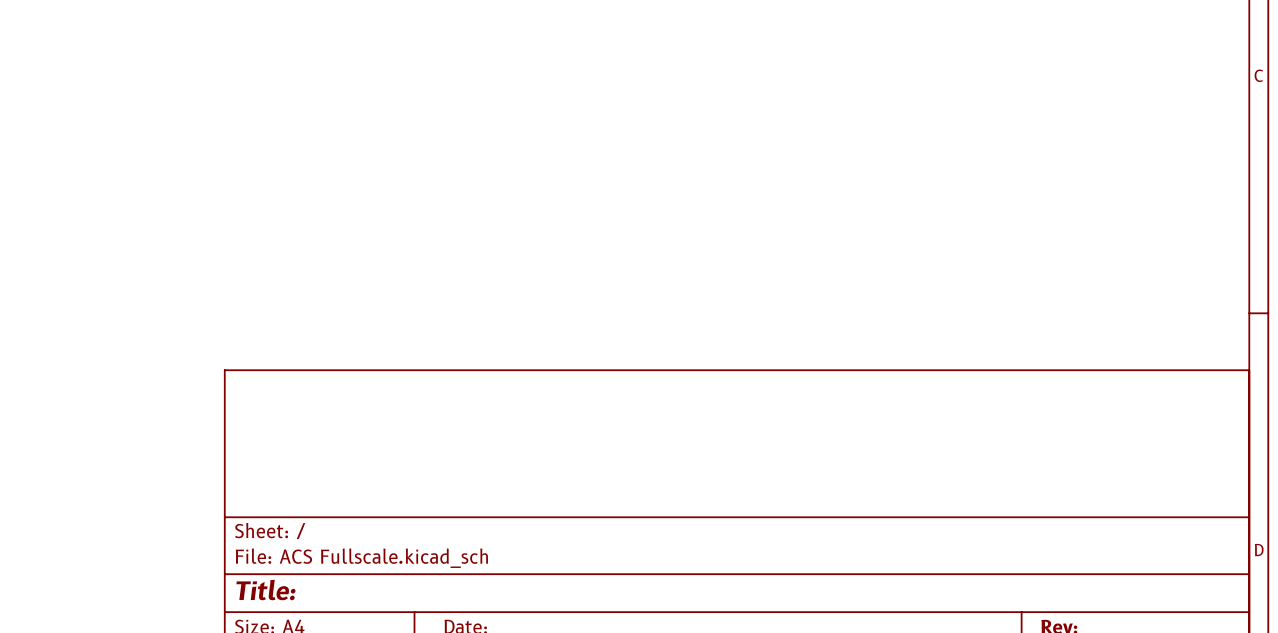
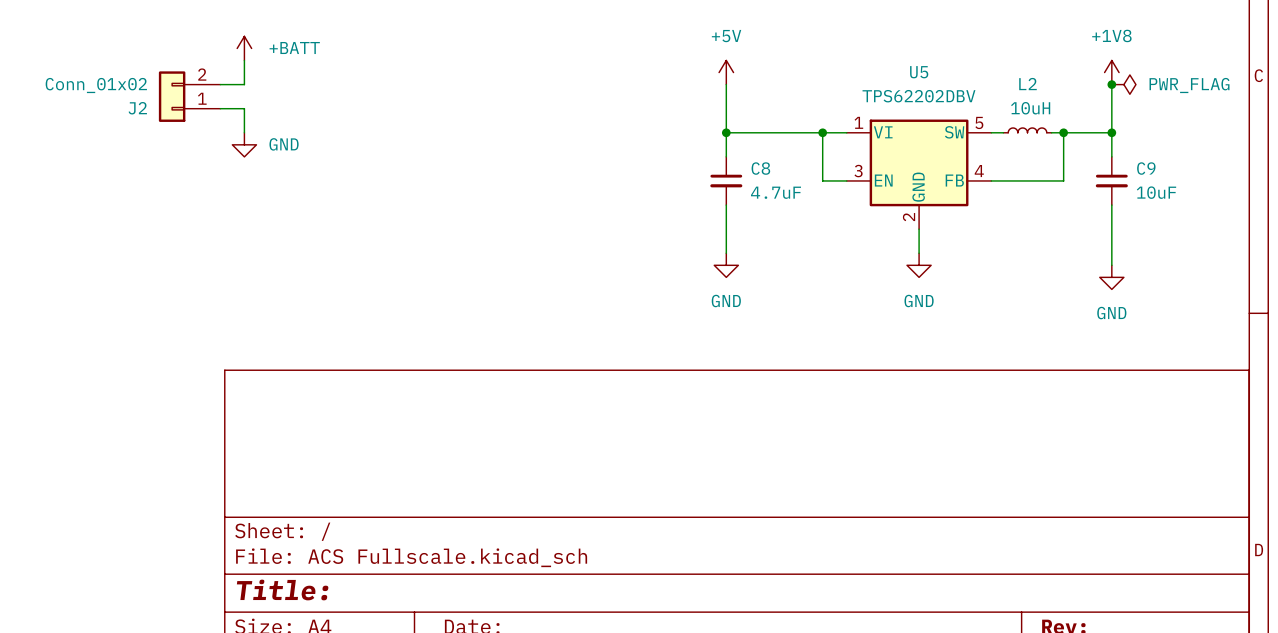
power symbol: none -> +BATT (244, 48)
wire: none -> (244, 60) (244, 84) (220, 84)
power symbol: none -> +5V (726, 72)
power symbol: none -> +1V8 (1111, 72)
wire: none -> (726, 84) (726, 156)
wire: none -> (1111, 84) (1111, 156)
junction: none -> (1111, 84)
power symbol: none -> PWR_FLAG (1123, 84)
J2: none -> Conn_01x02 (189, 96)
wire: none -> (220, 108) (244, 108) (244, 132)
L2: none -> 10uH (1027, 130)
wire: none -> (726, 132) (846, 132)
junction: none -> (726, 132)
wire: none -> (822, 132) (822, 180) (846, 180)
junction: none -> (822, 132)
wire: none -> (991, 132) (1003, 132)
wire: none -> (1051, 132) (1111, 132)
wire: none -> (1063, 132) (1063, 180) (991, 180)
junction: none -> (1063, 132)
junction: none -> (1111, 132)
power symbol: none -> GND (244, 144)
U5: none -> TPS62202DBV (919, 174)
C8: none -> 4.7uF (726, 180)
C9: none -> 10uF (1111, 180)
wire: none -> (726, 205) (726, 253)
wire: none -> (1111, 205) (1111, 265)
wire: none -> (919, 229) (919, 253)
power symbol: none -> GND (726, 265)
power symbol: none -> GND (919, 265)
power symbol: none -> GND (1111, 277)

